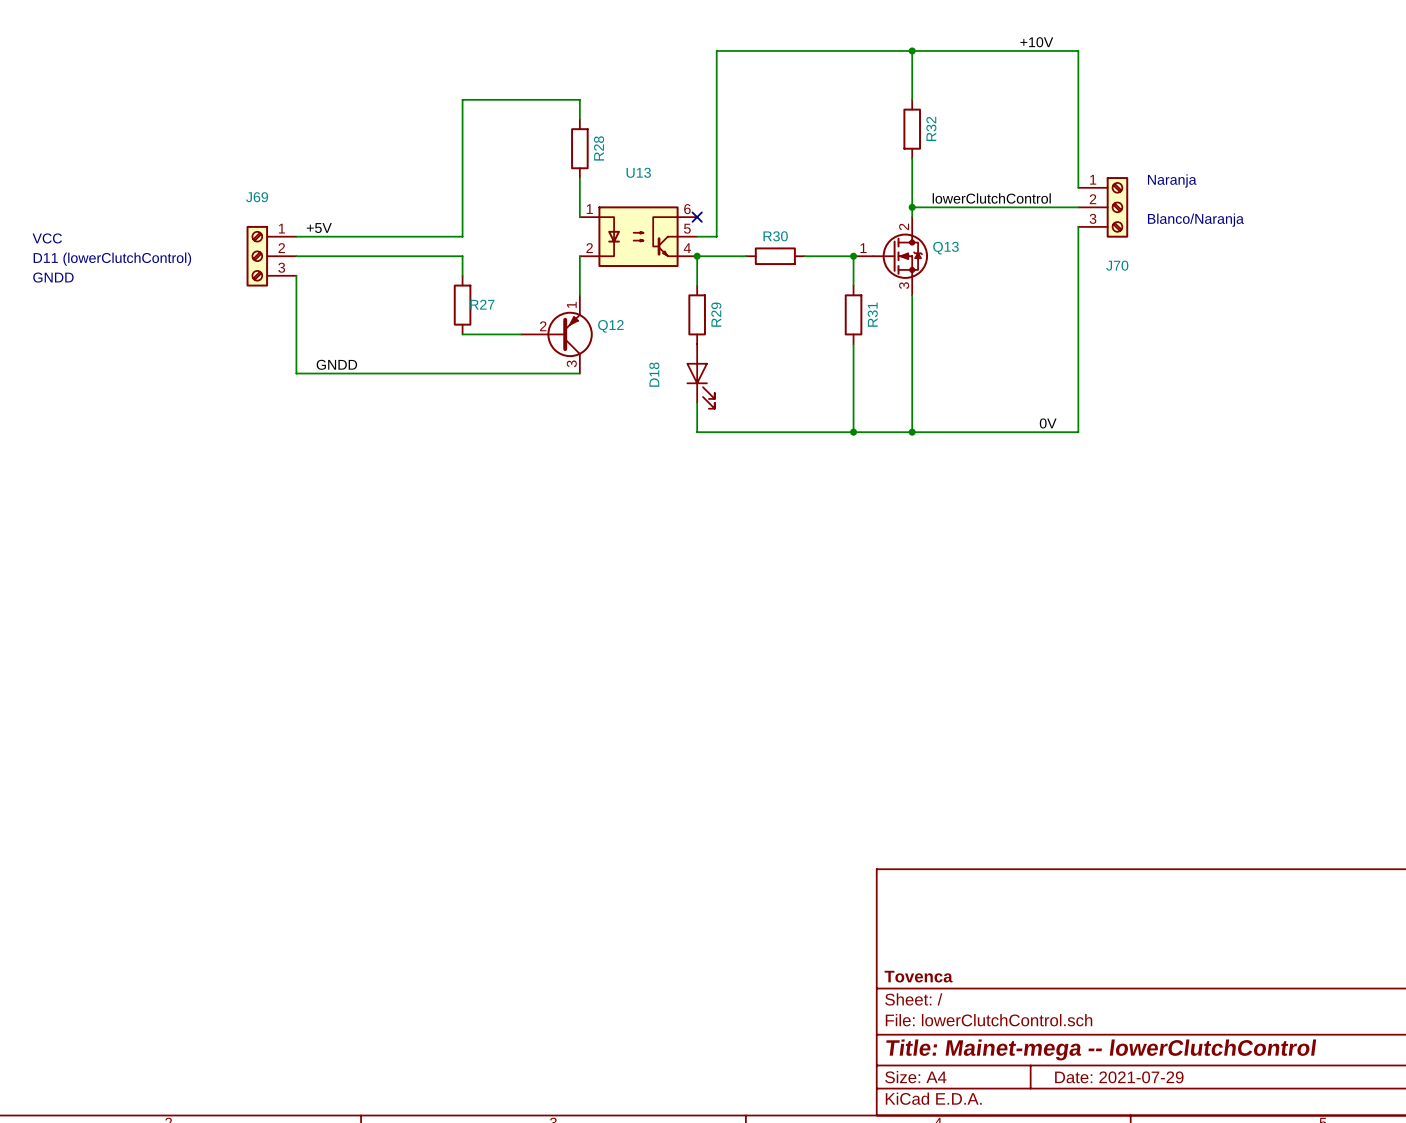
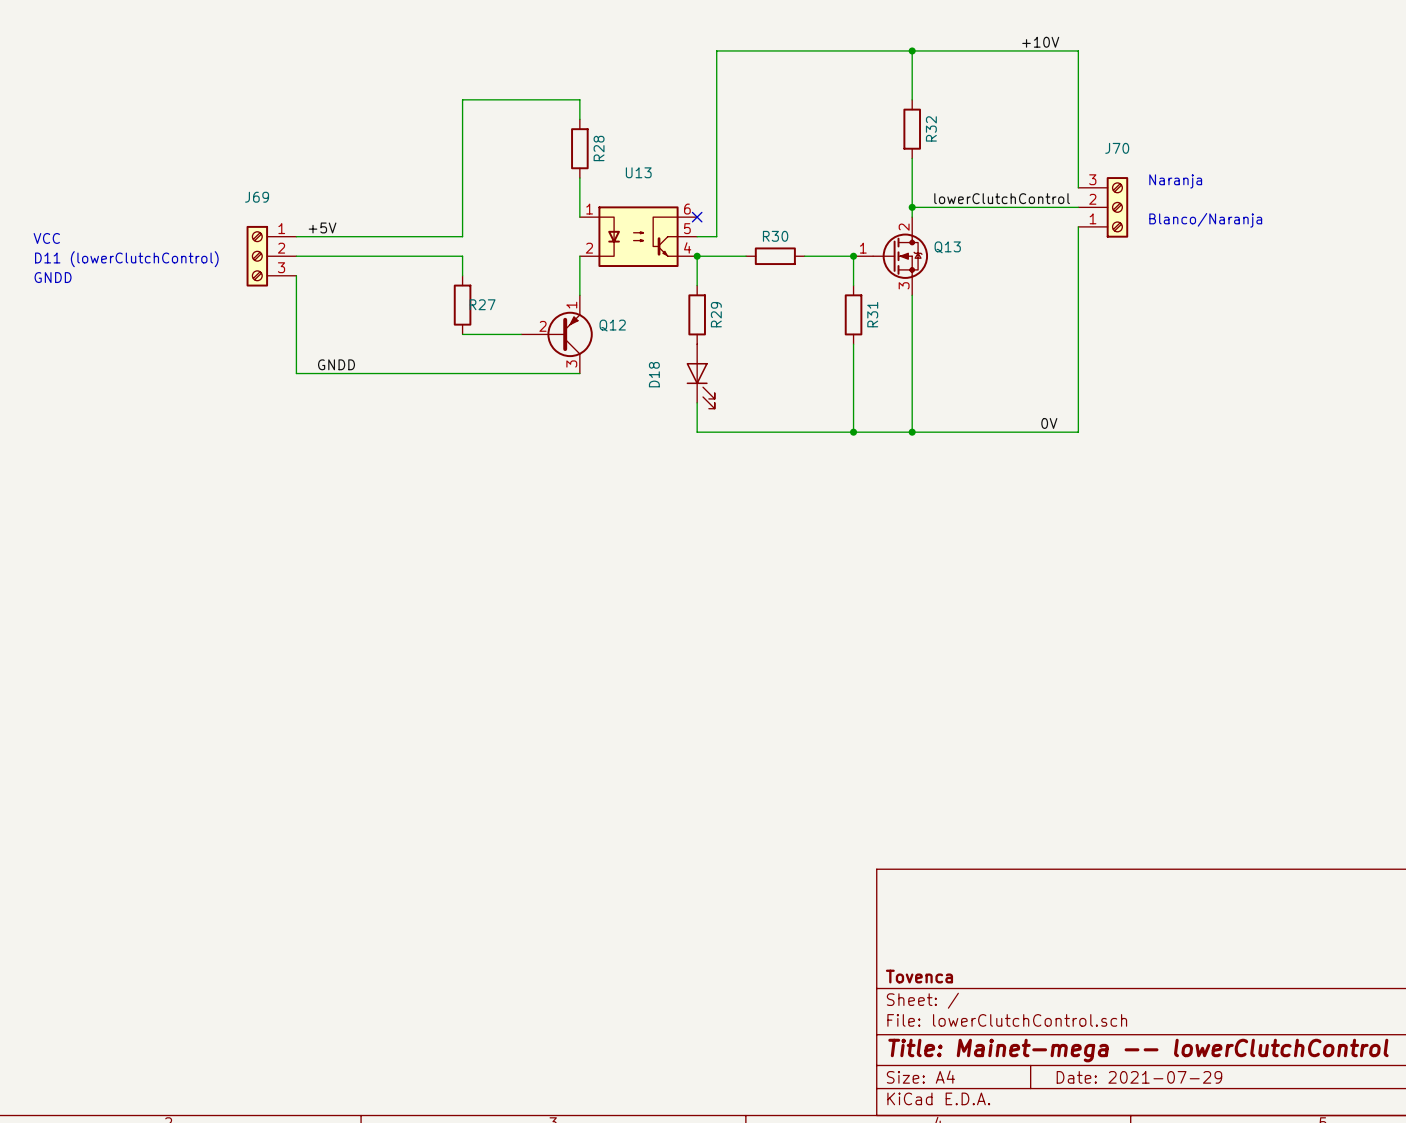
J70 flip: as is (1117, 207) -> up-down (1117, 207)

